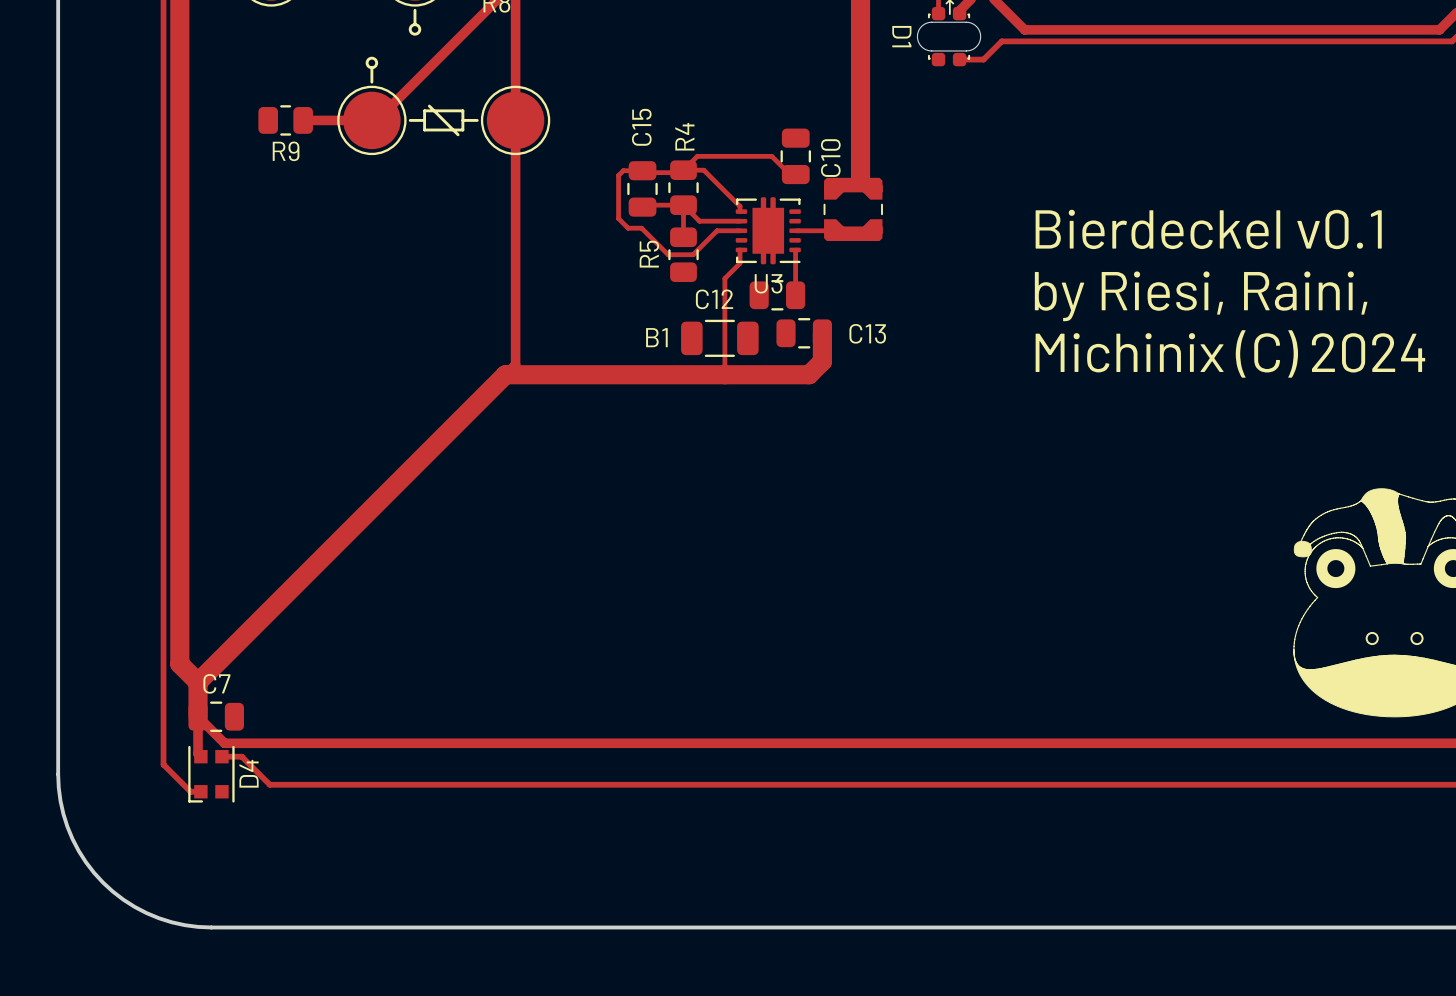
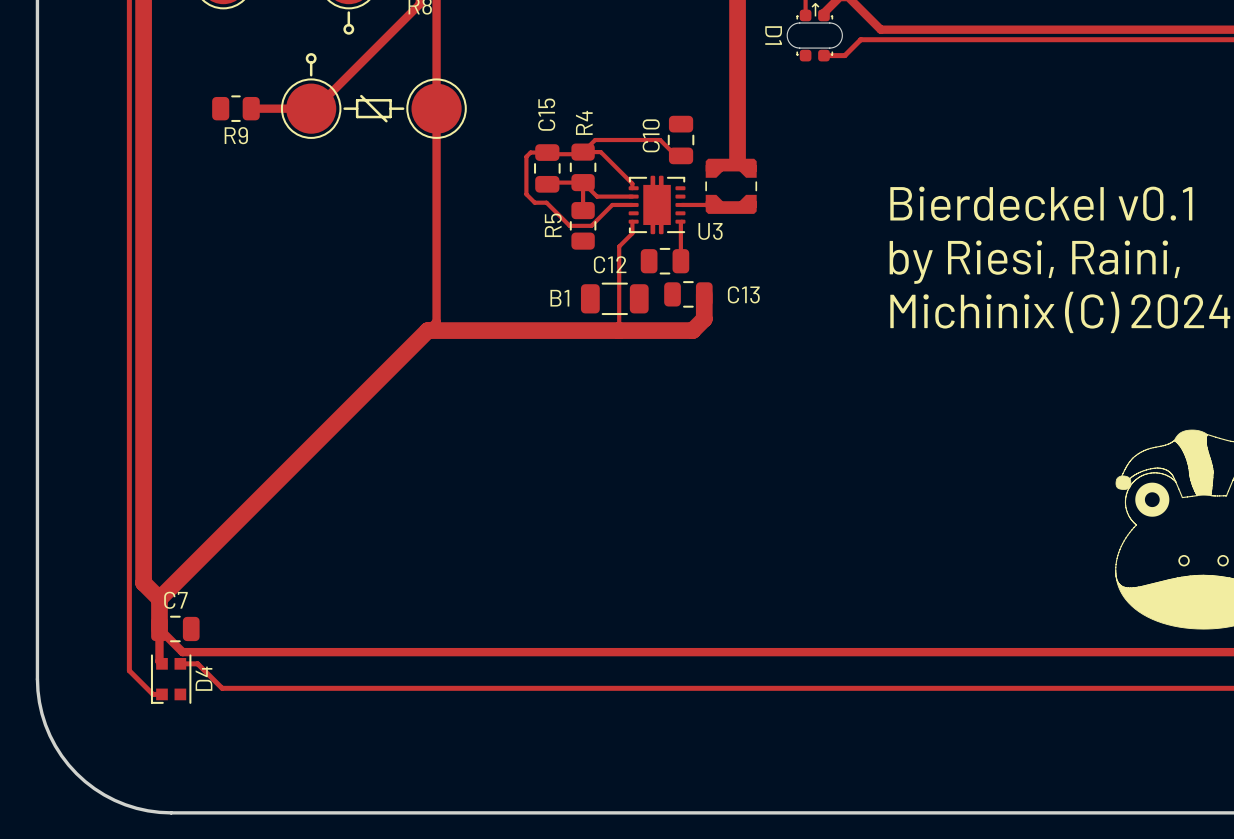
C10 name position: C10 (830, 158) -> C10 (651, 135)
U3 name position: U3 (768, 283) -> U3 (710, 231)

